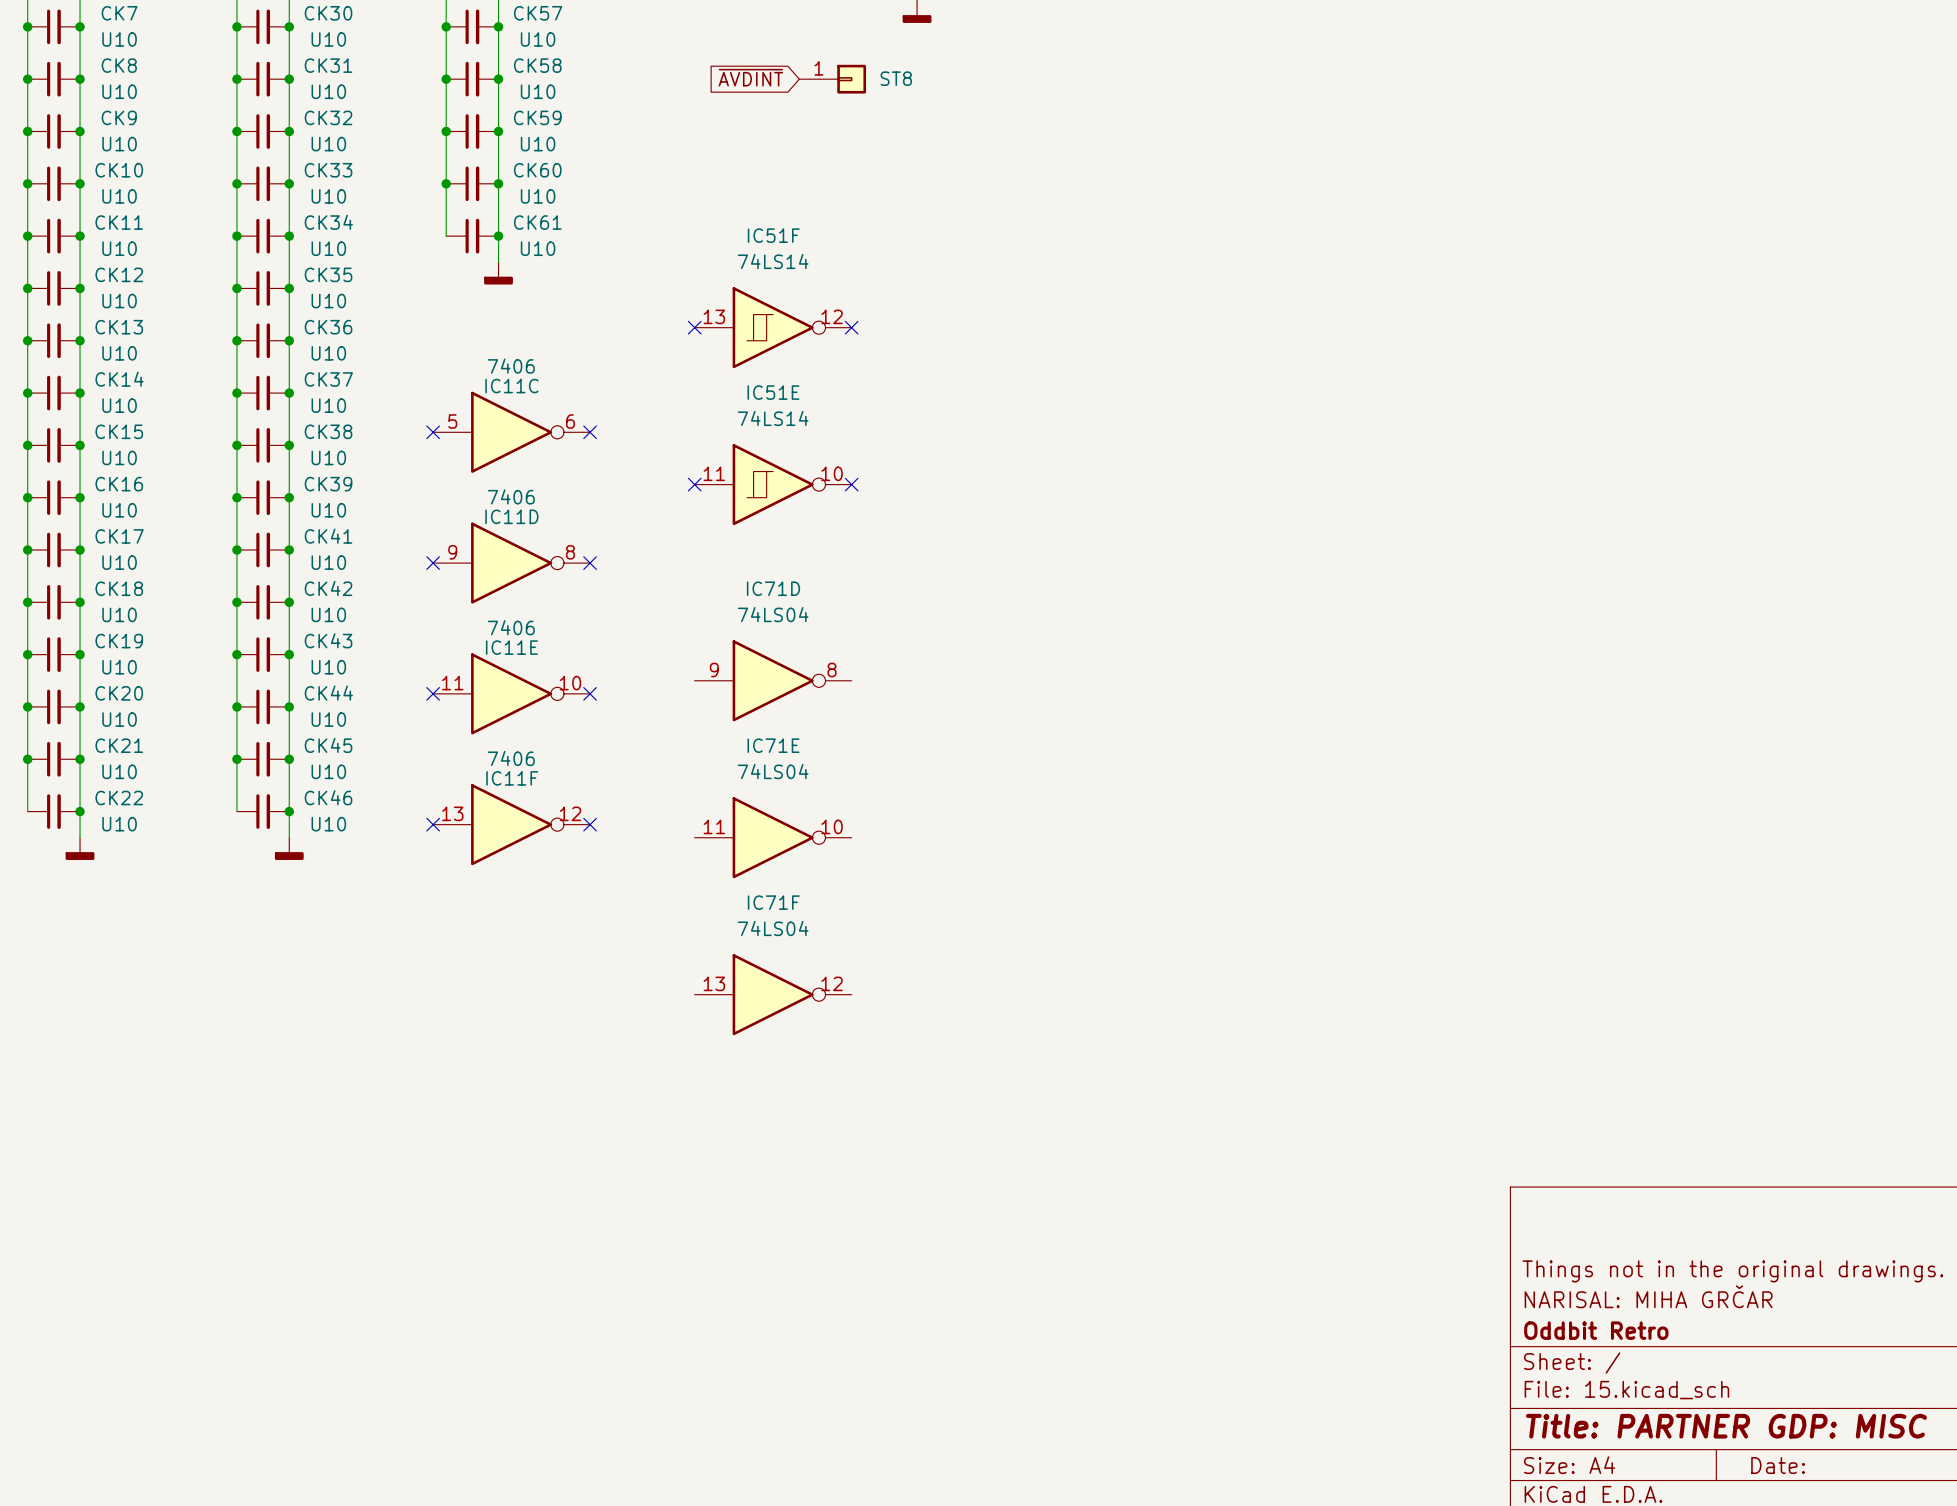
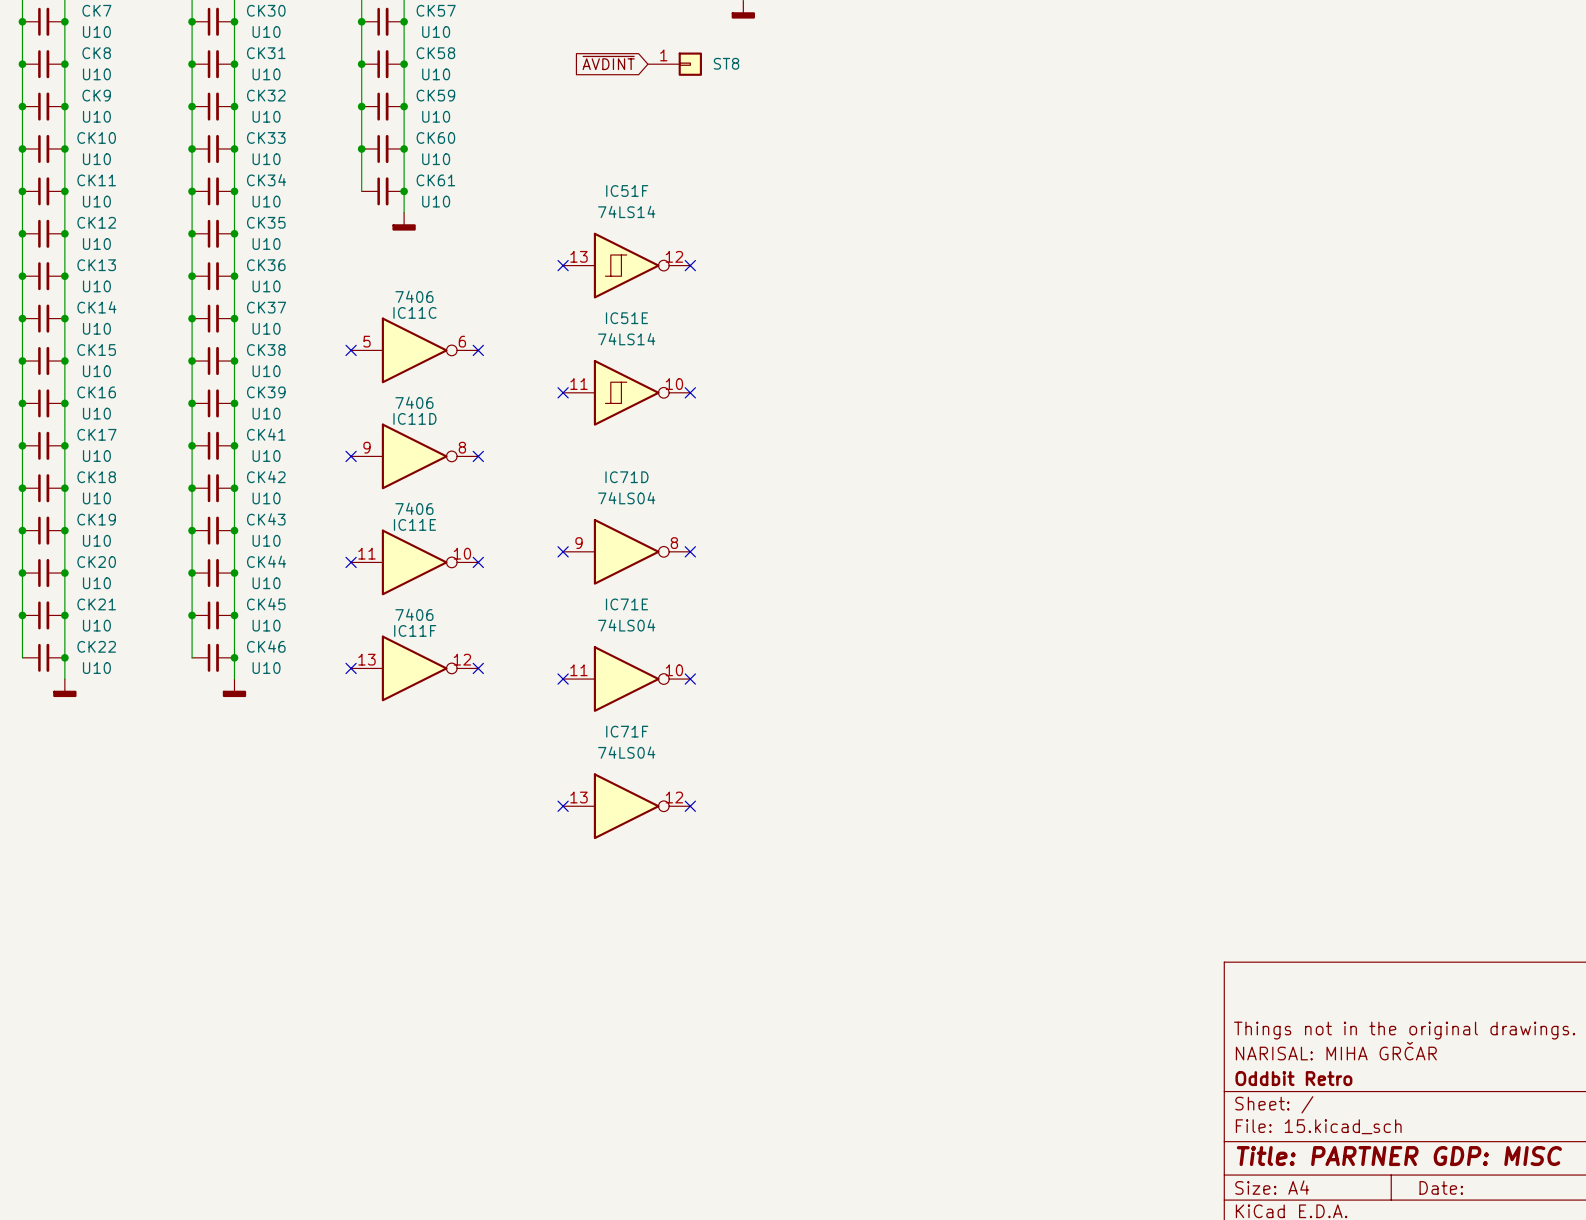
no-connect mark: none -> (563, 551)
no-connect mark: none -> (690, 551)
no-connect mark: none -> (563, 679)
no-connect mark: none -> (690, 679)
no-connect mark: none -> (563, 806)
no-connect mark: none -> (690, 806)

